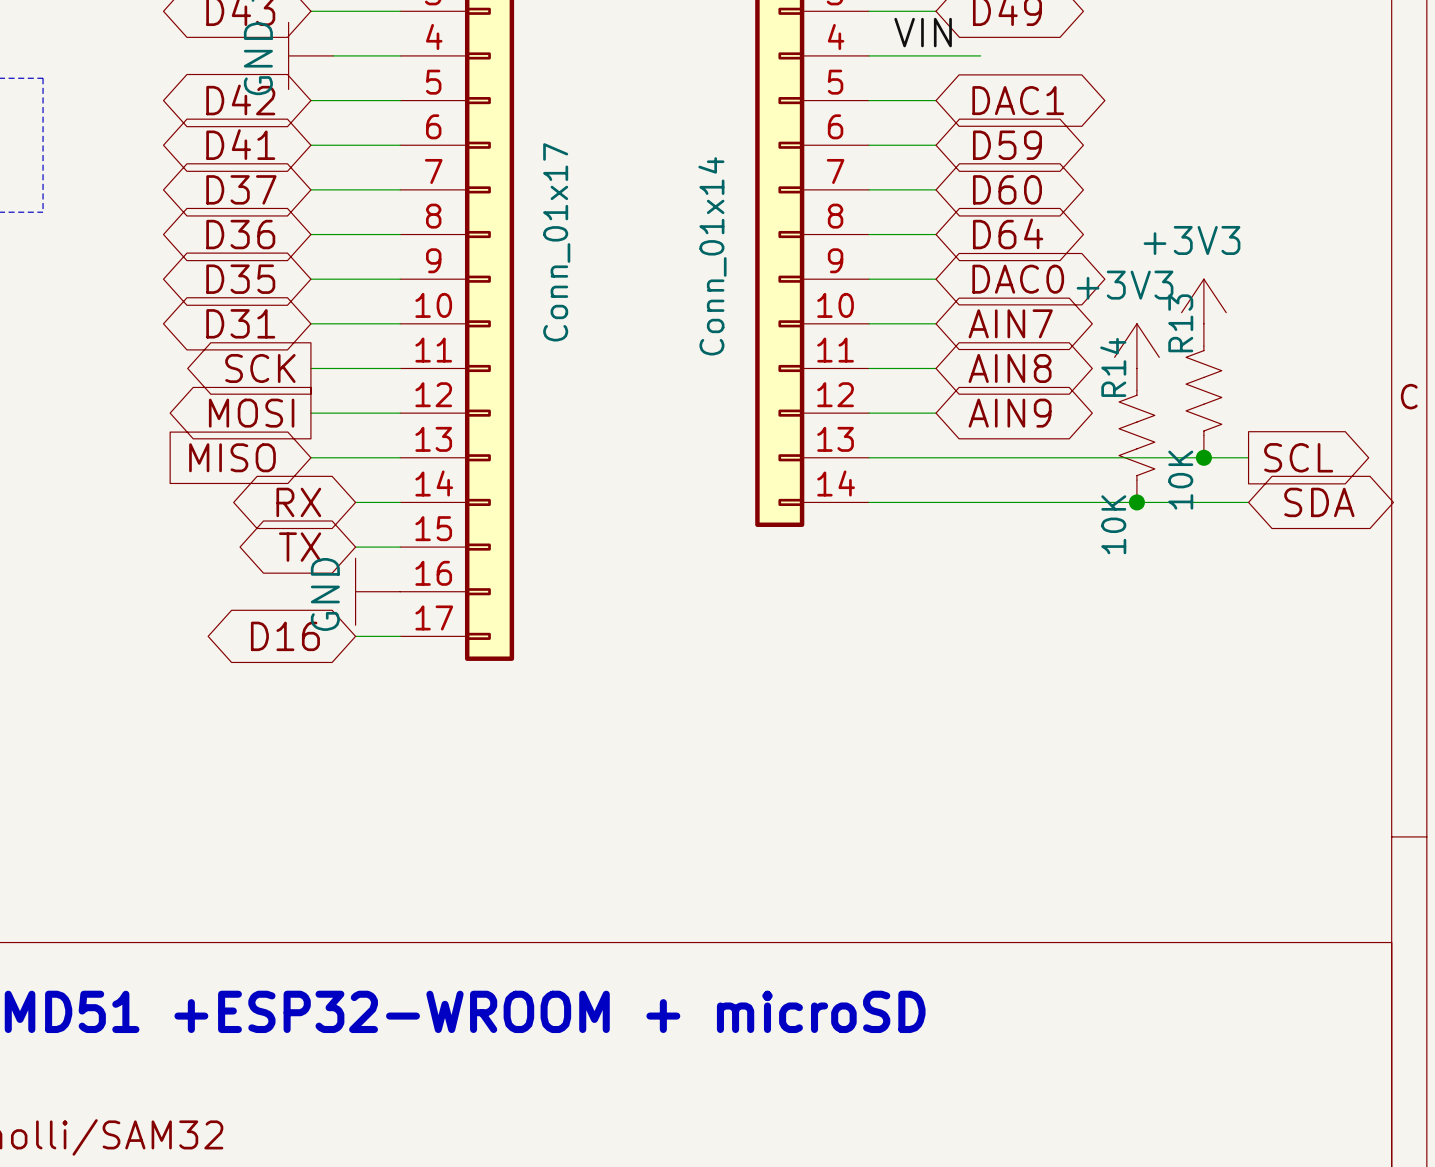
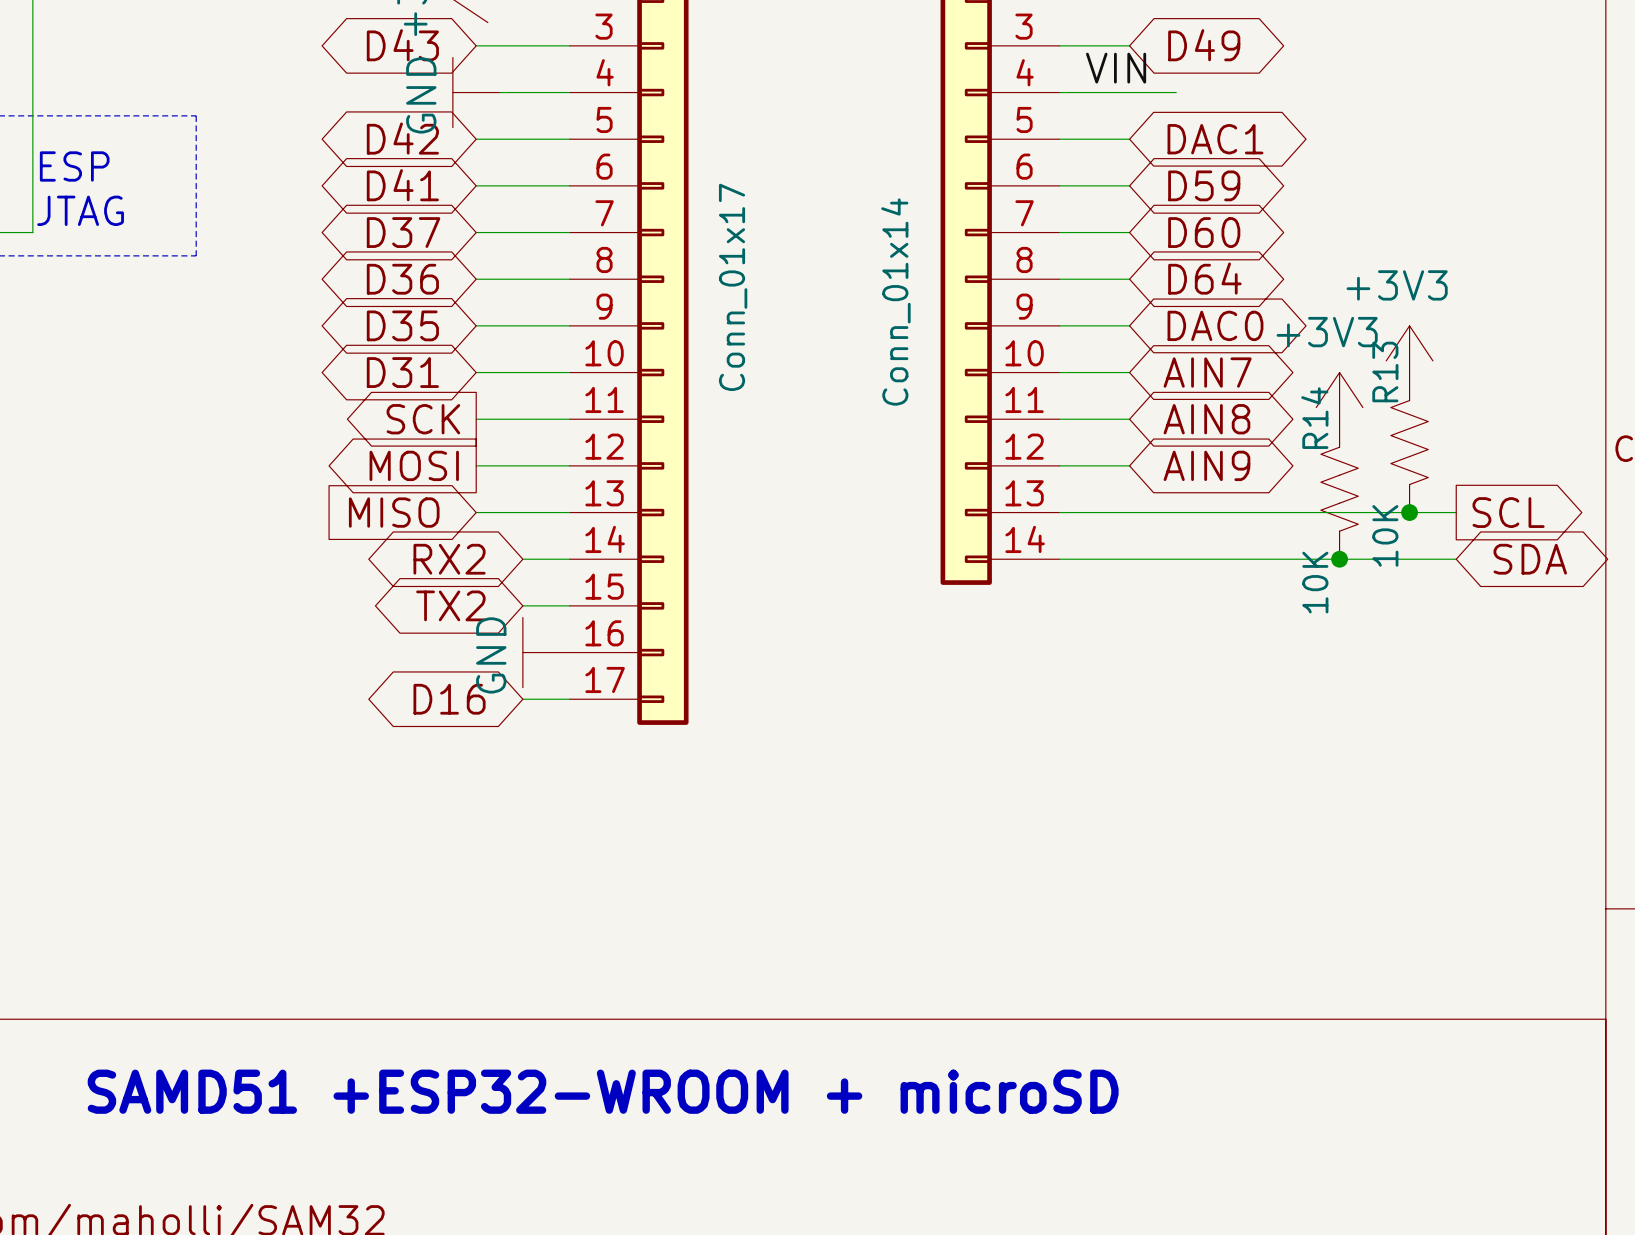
global label: RX (298, 502) -> RX2 (449, 559)
global label: TX (300, 547) -> TX2 (450, 605)

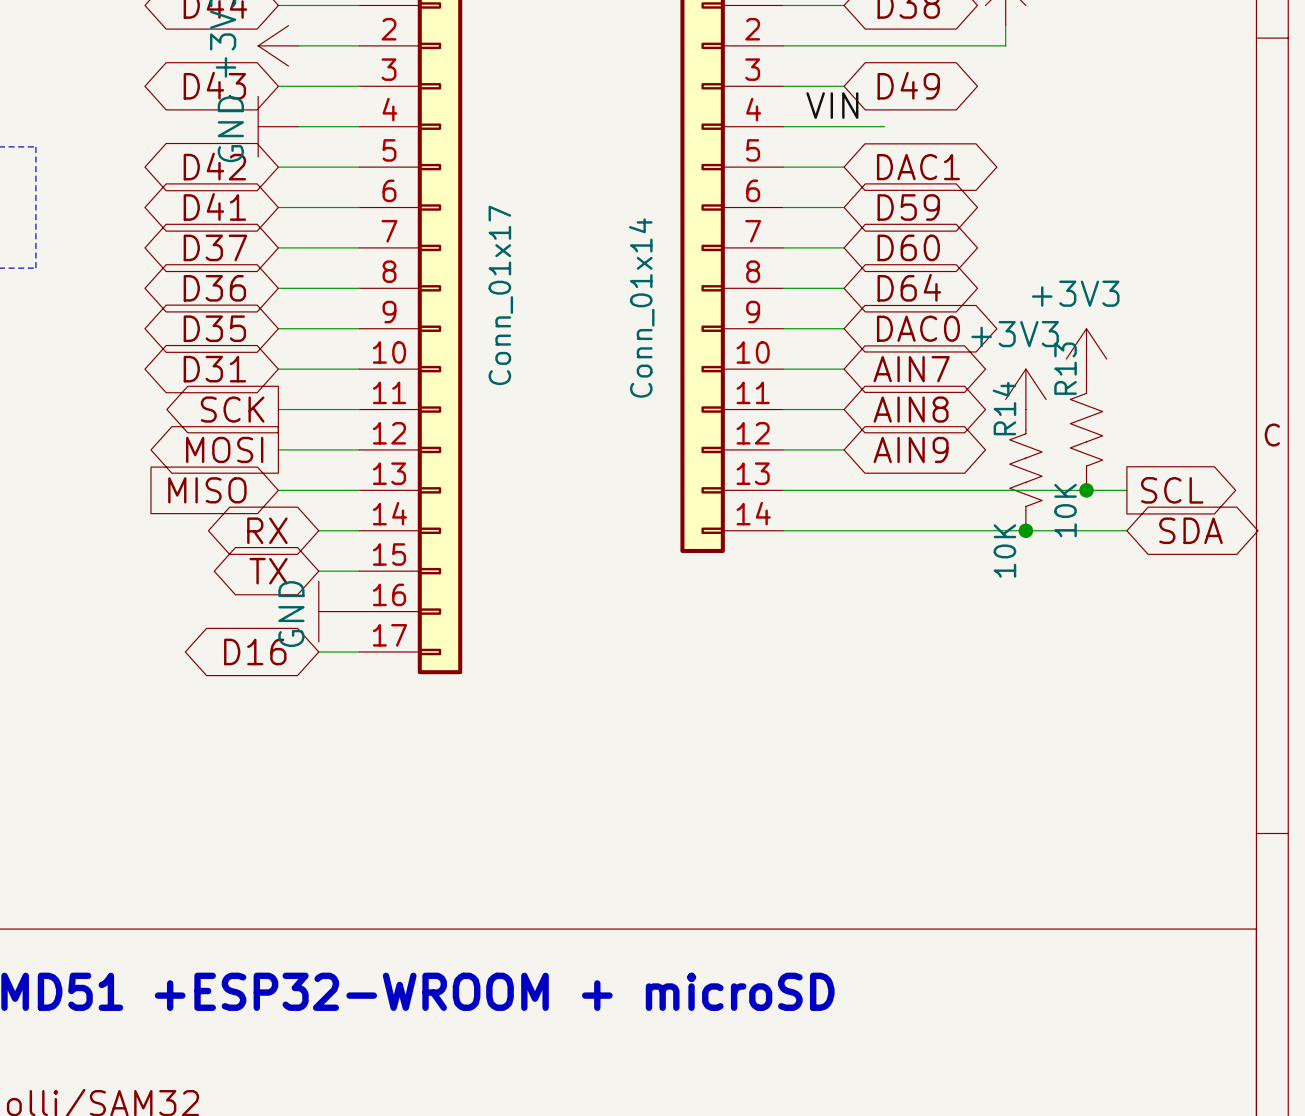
global label: RX2 (449, 559) -> RX (267, 530)
global label: TX2 (450, 605) -> TX (268, 571)

